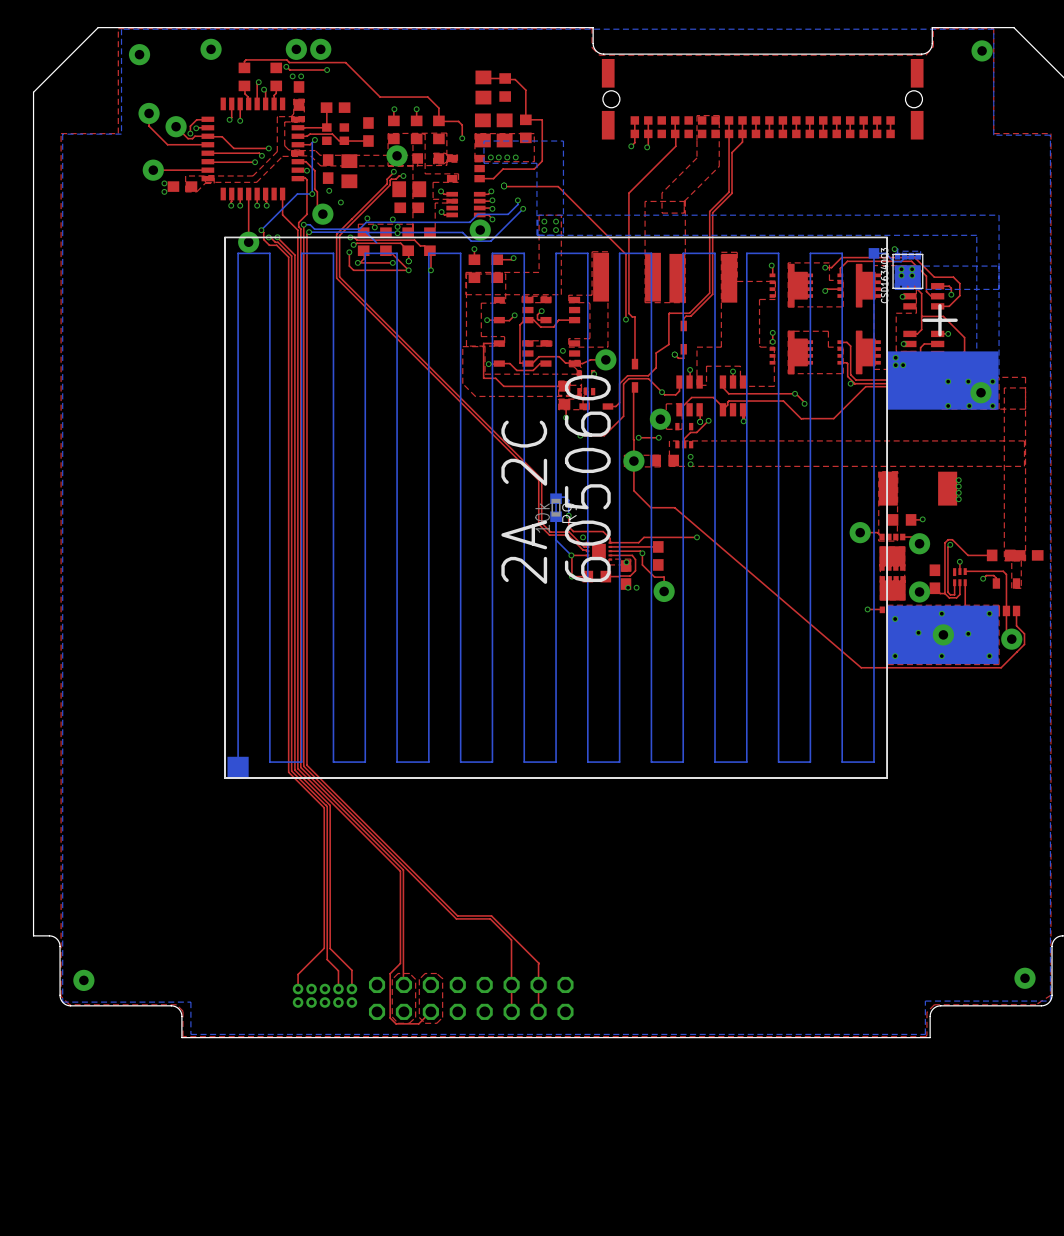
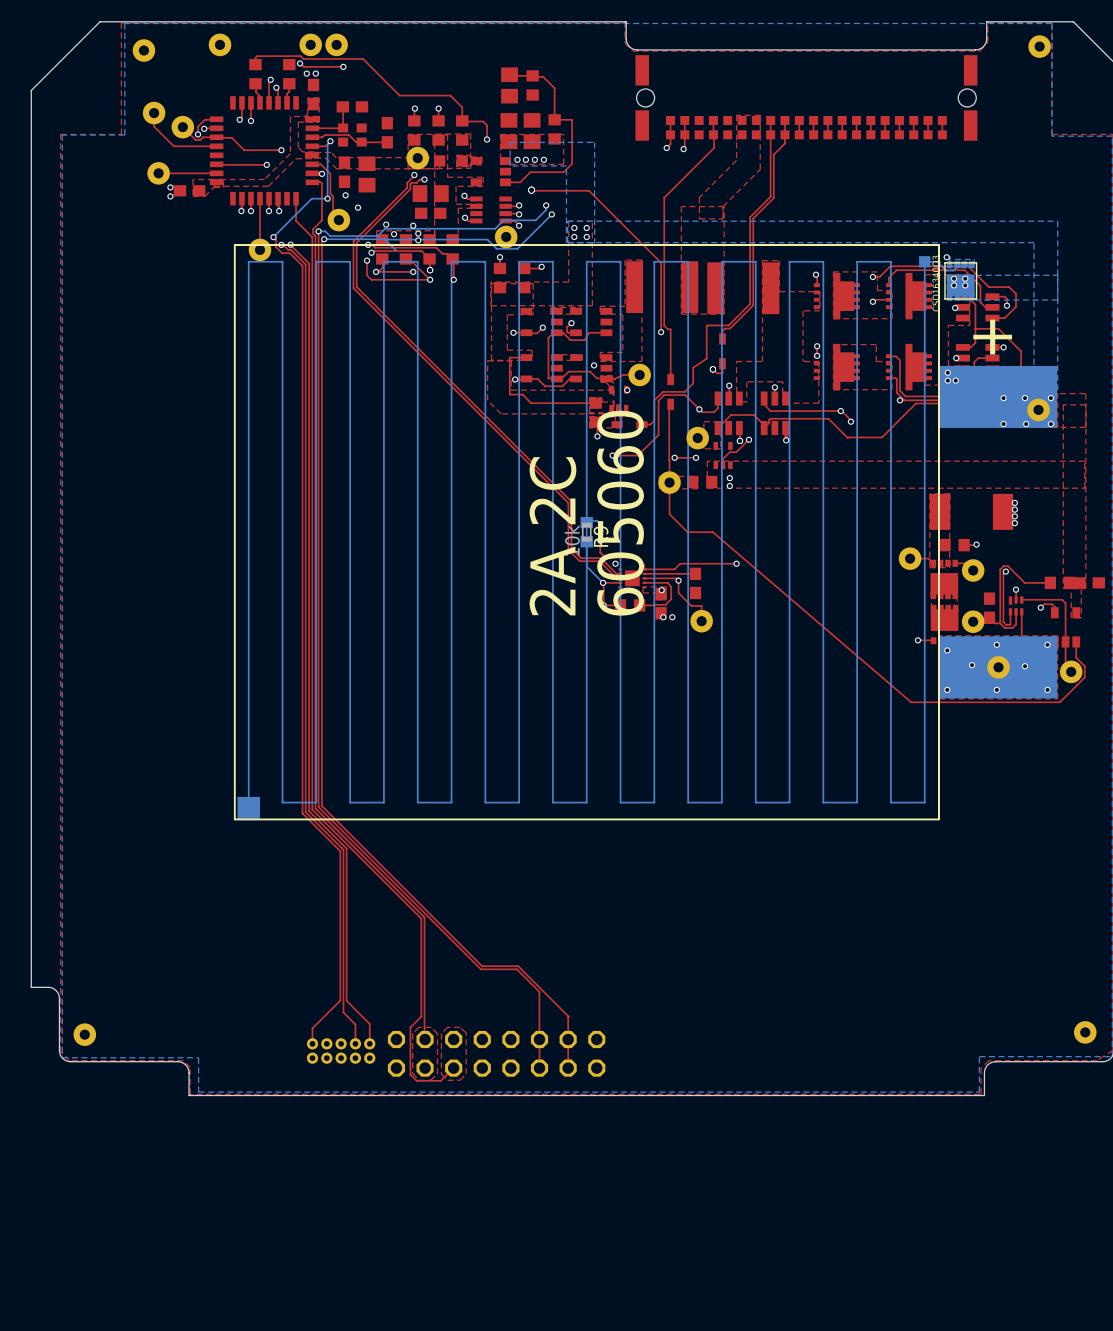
top track: (207, 153) (259, 153) (261, 155) -> none
via: (261, 155) -> none
top track: (491, 191) (488, 194) (479, 194) -> none
via: (491, 191) -> none

